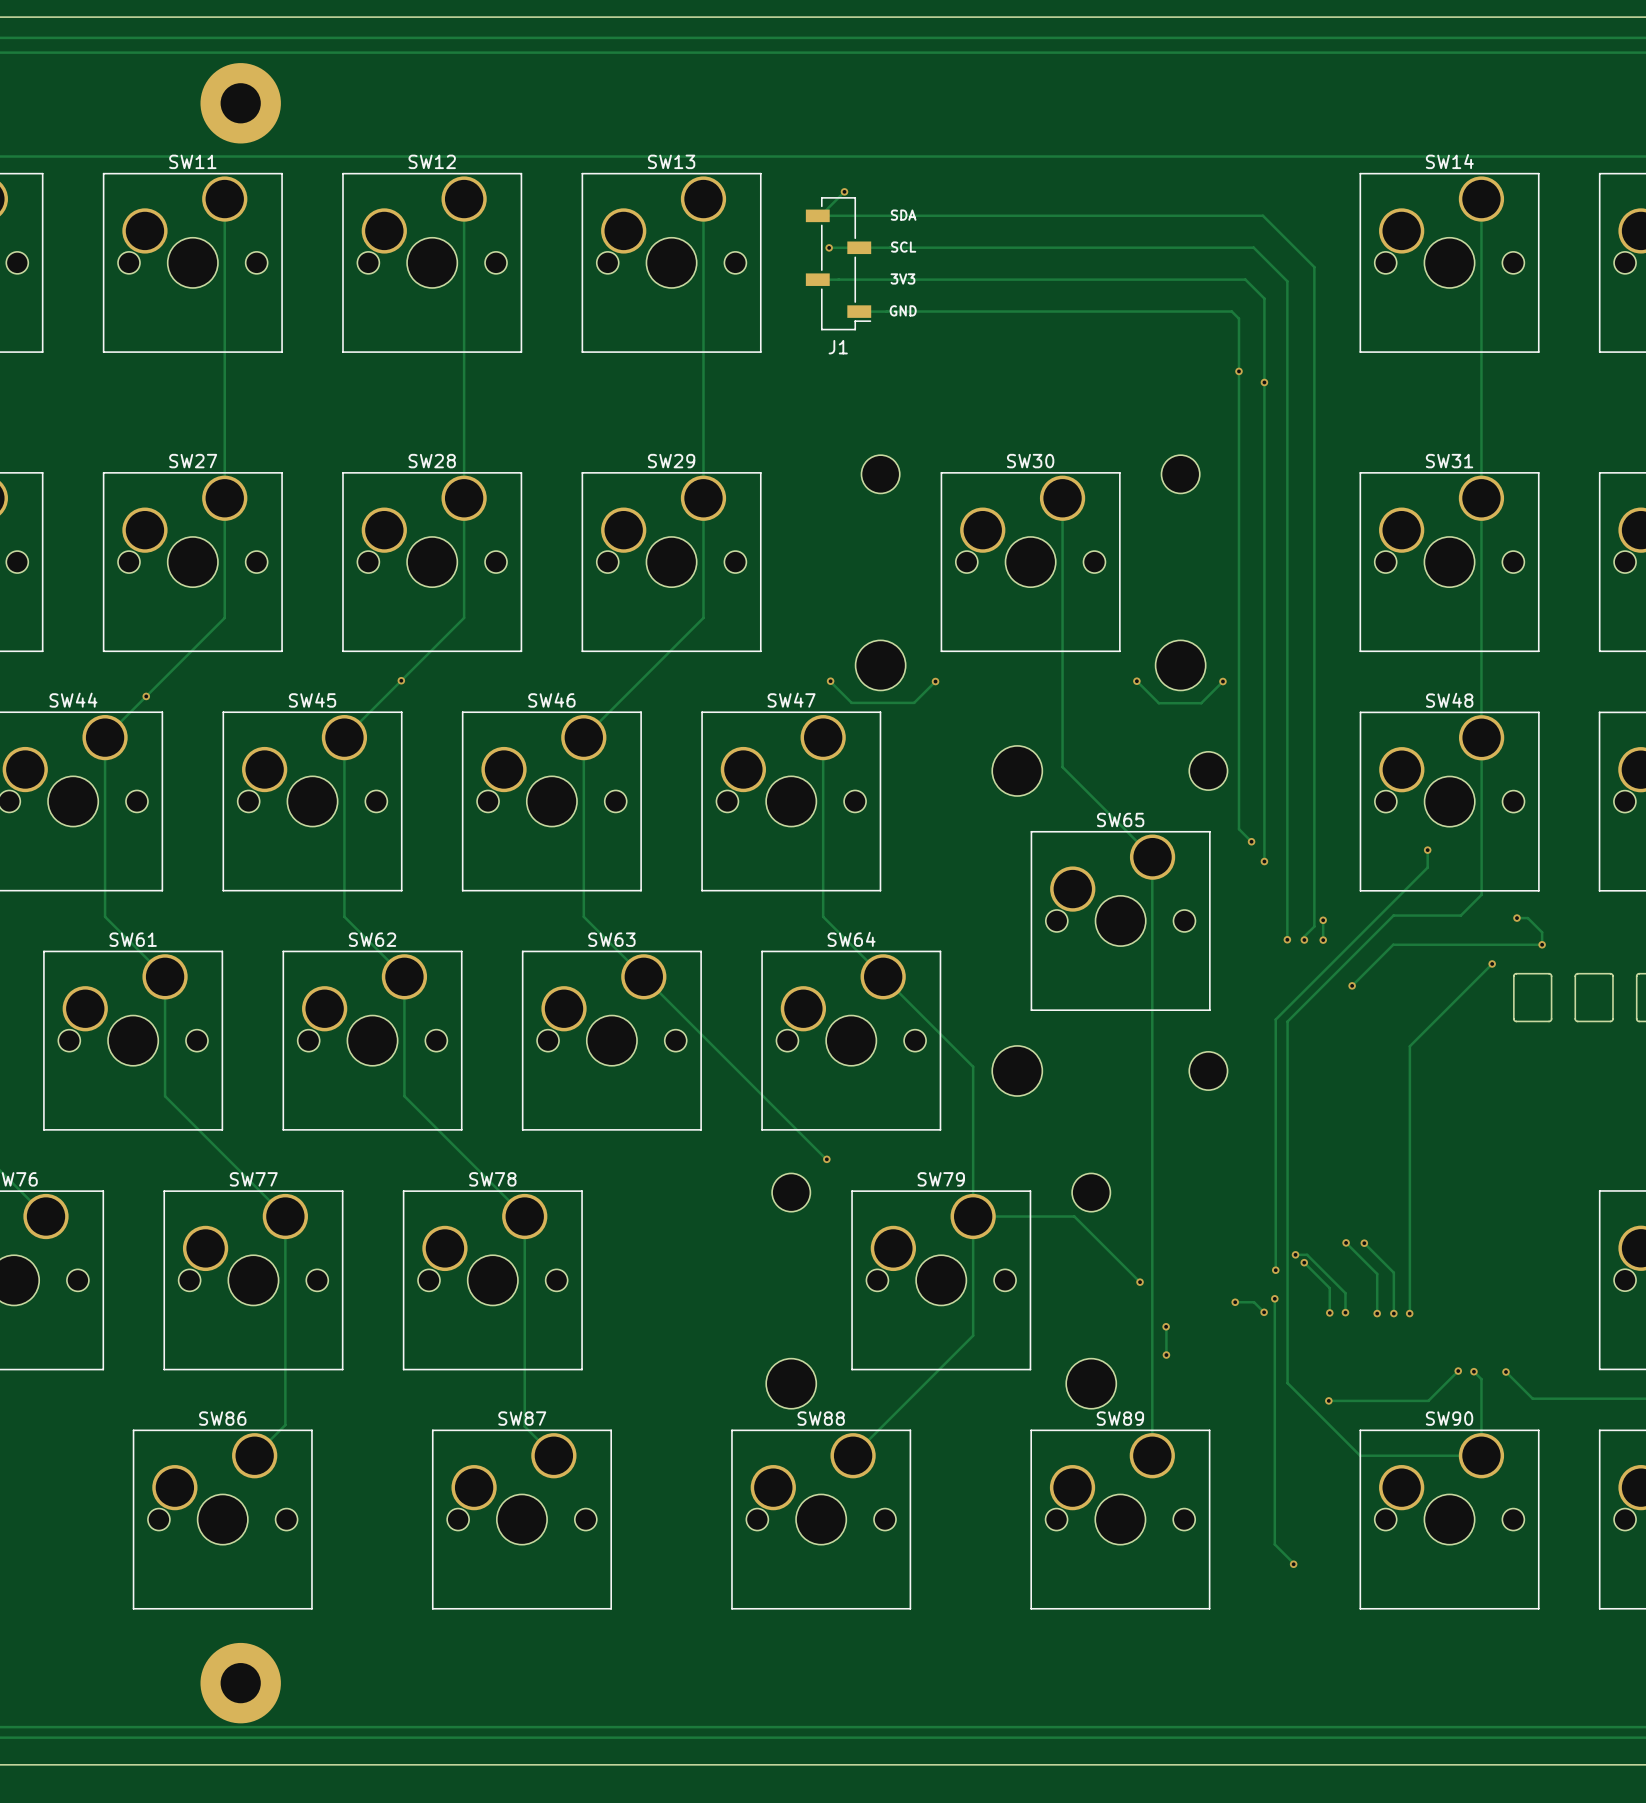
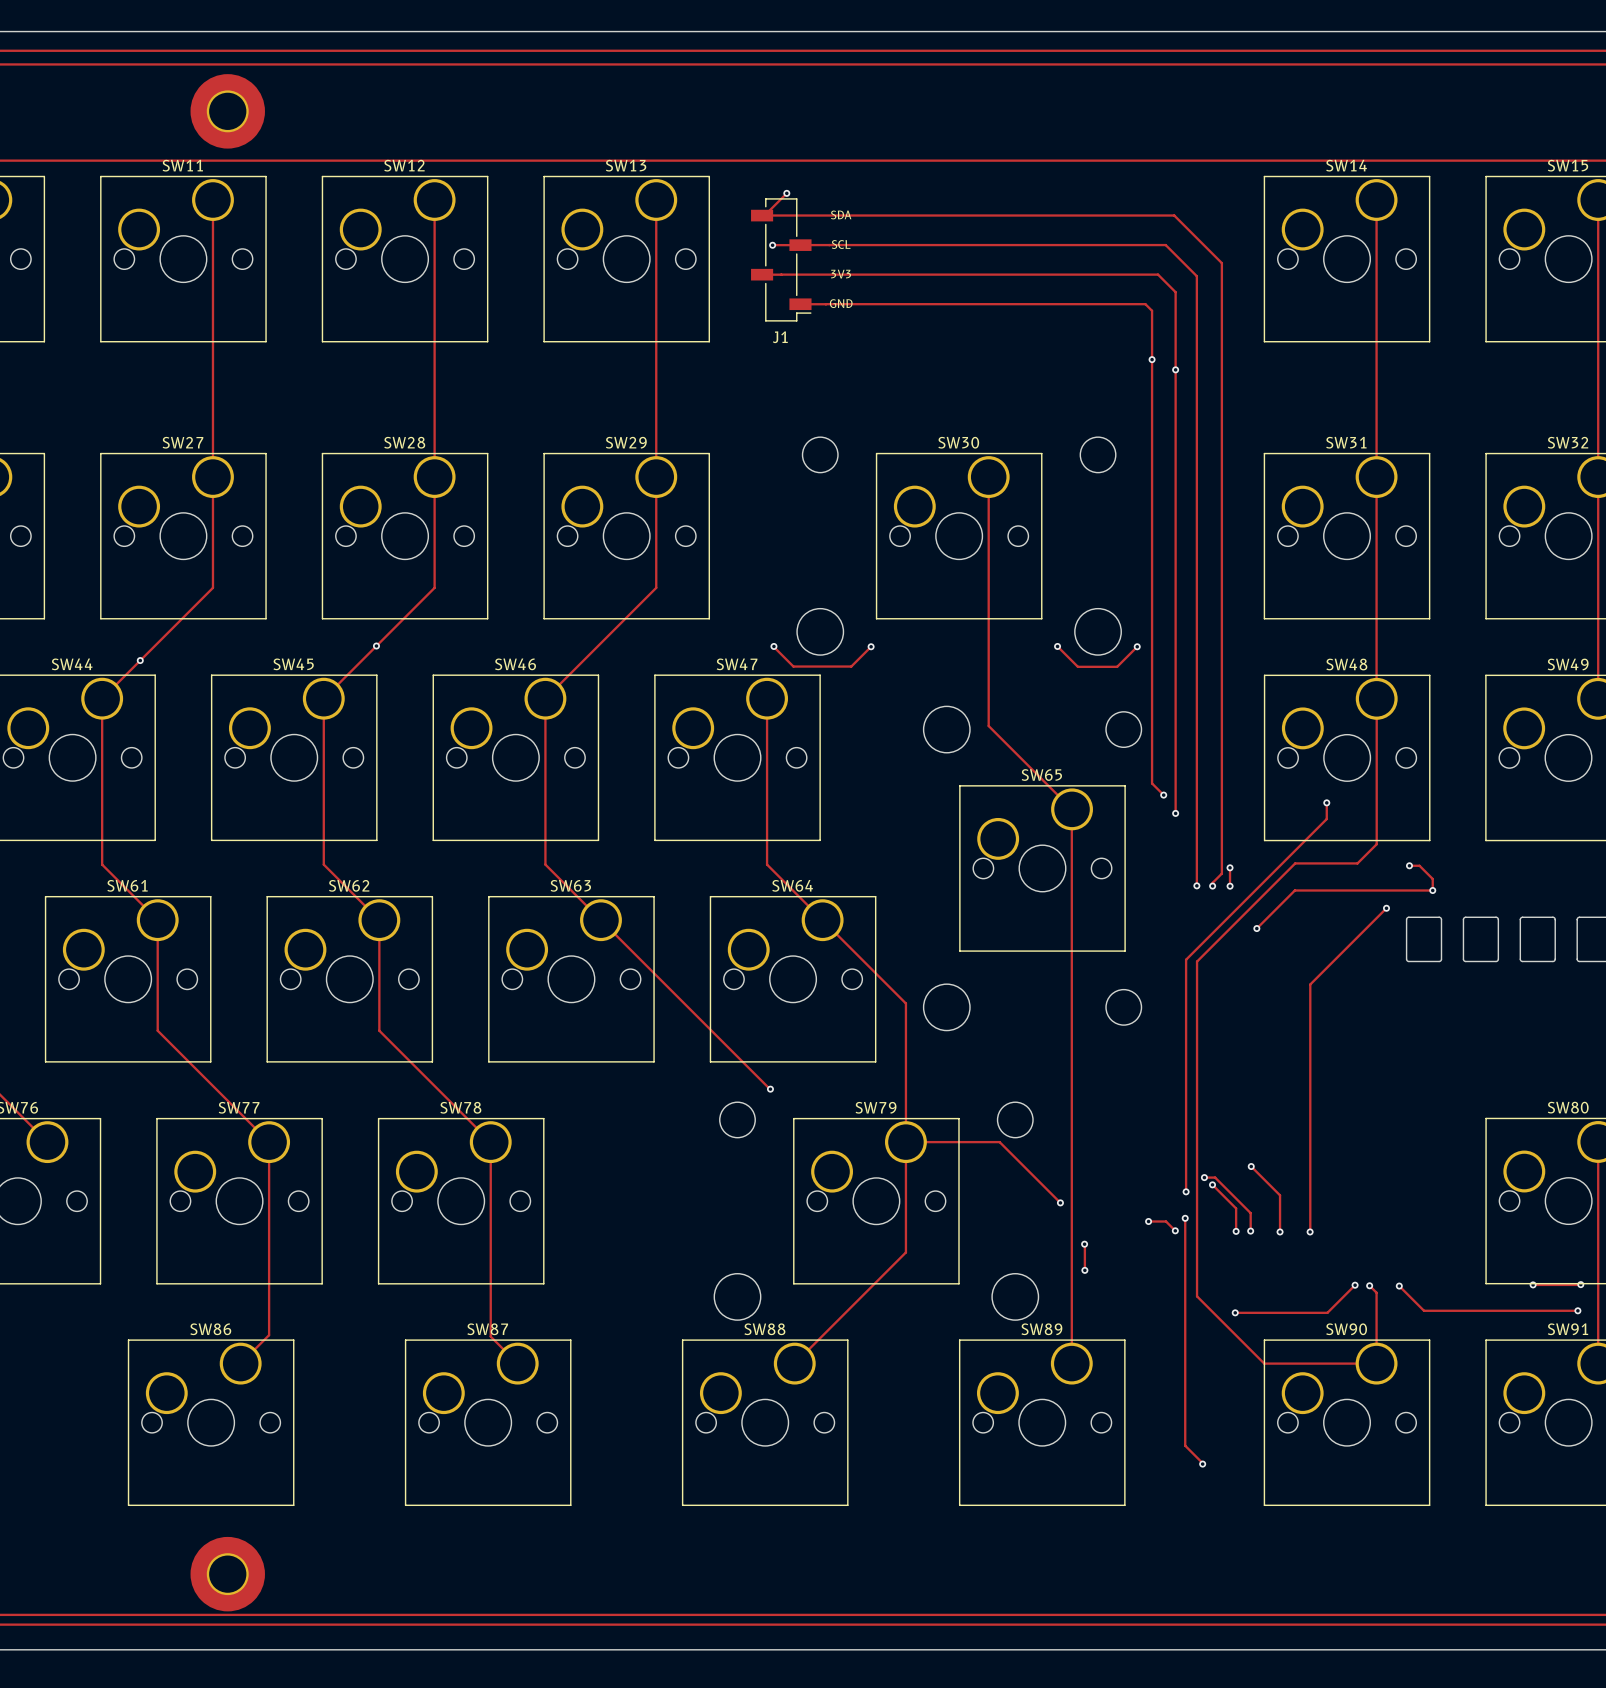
track: (1364, 1243) (1393, 1272) (1393, 1313) -> none
via: (1364, 1243) -> none
via: (1393, 1313) -> none

